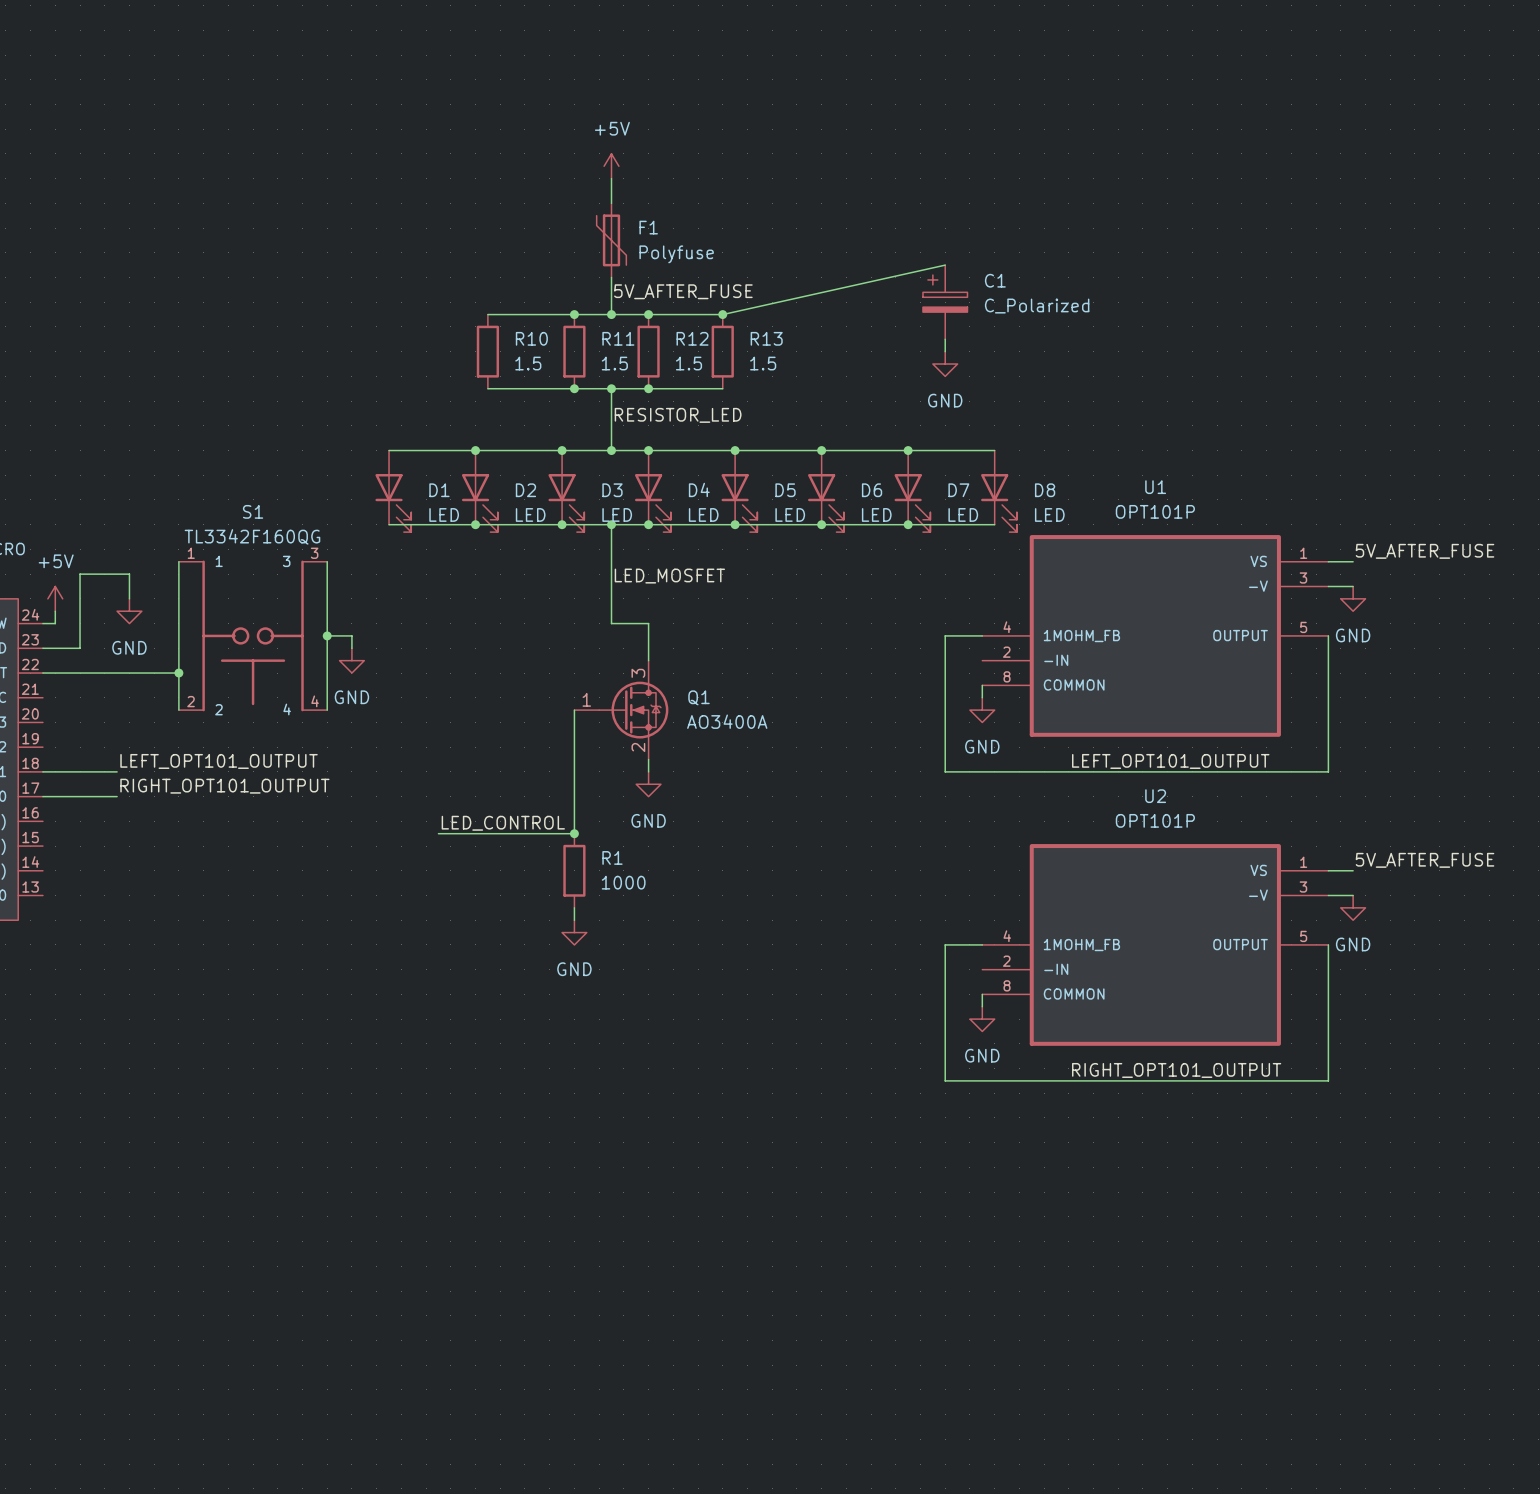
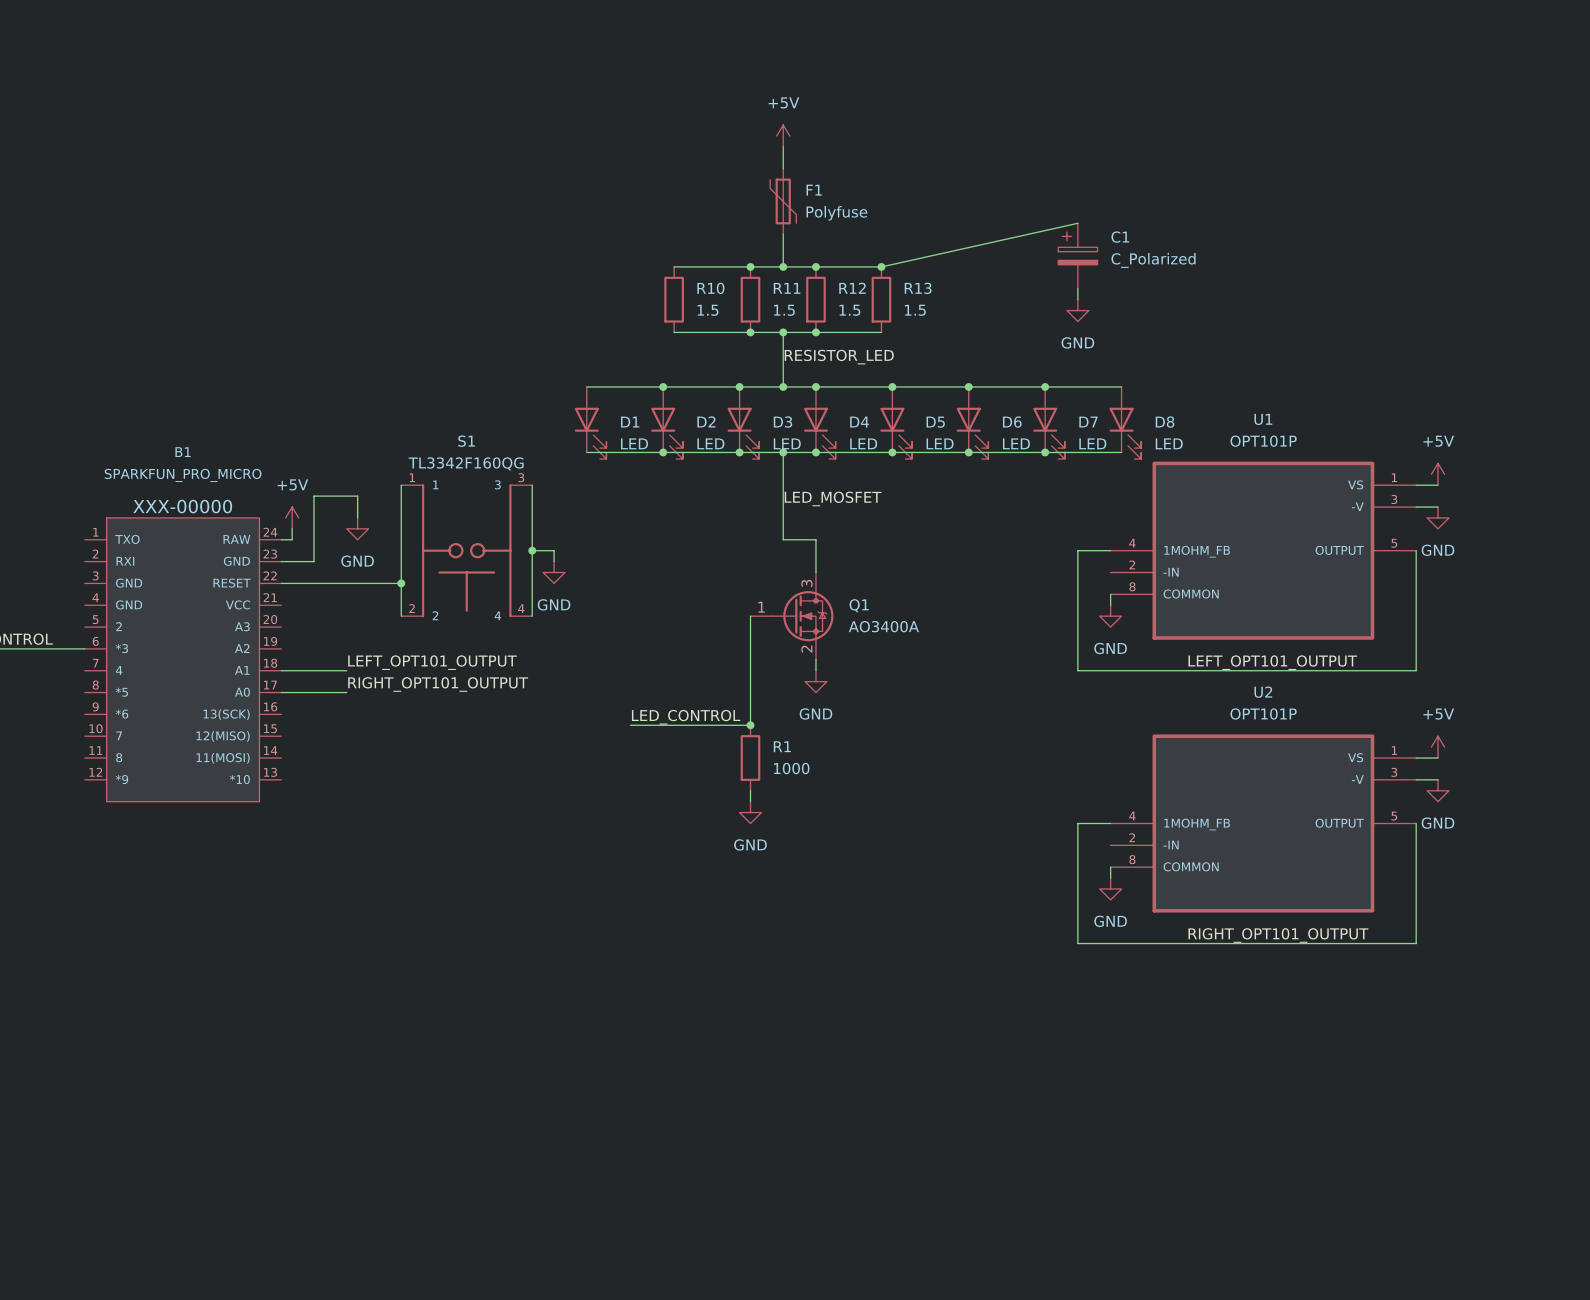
label: 5V_AFTER_FUSE (683, 291) -> none
power symbol: none -> +5V (1438, 474)
label: 5V_AFTER_FUSE (1425, 551) -> none
power symbol: none -> +5V (1438, 747)
label: 5V_AFTER_FUSE (1425, 860) -> none

